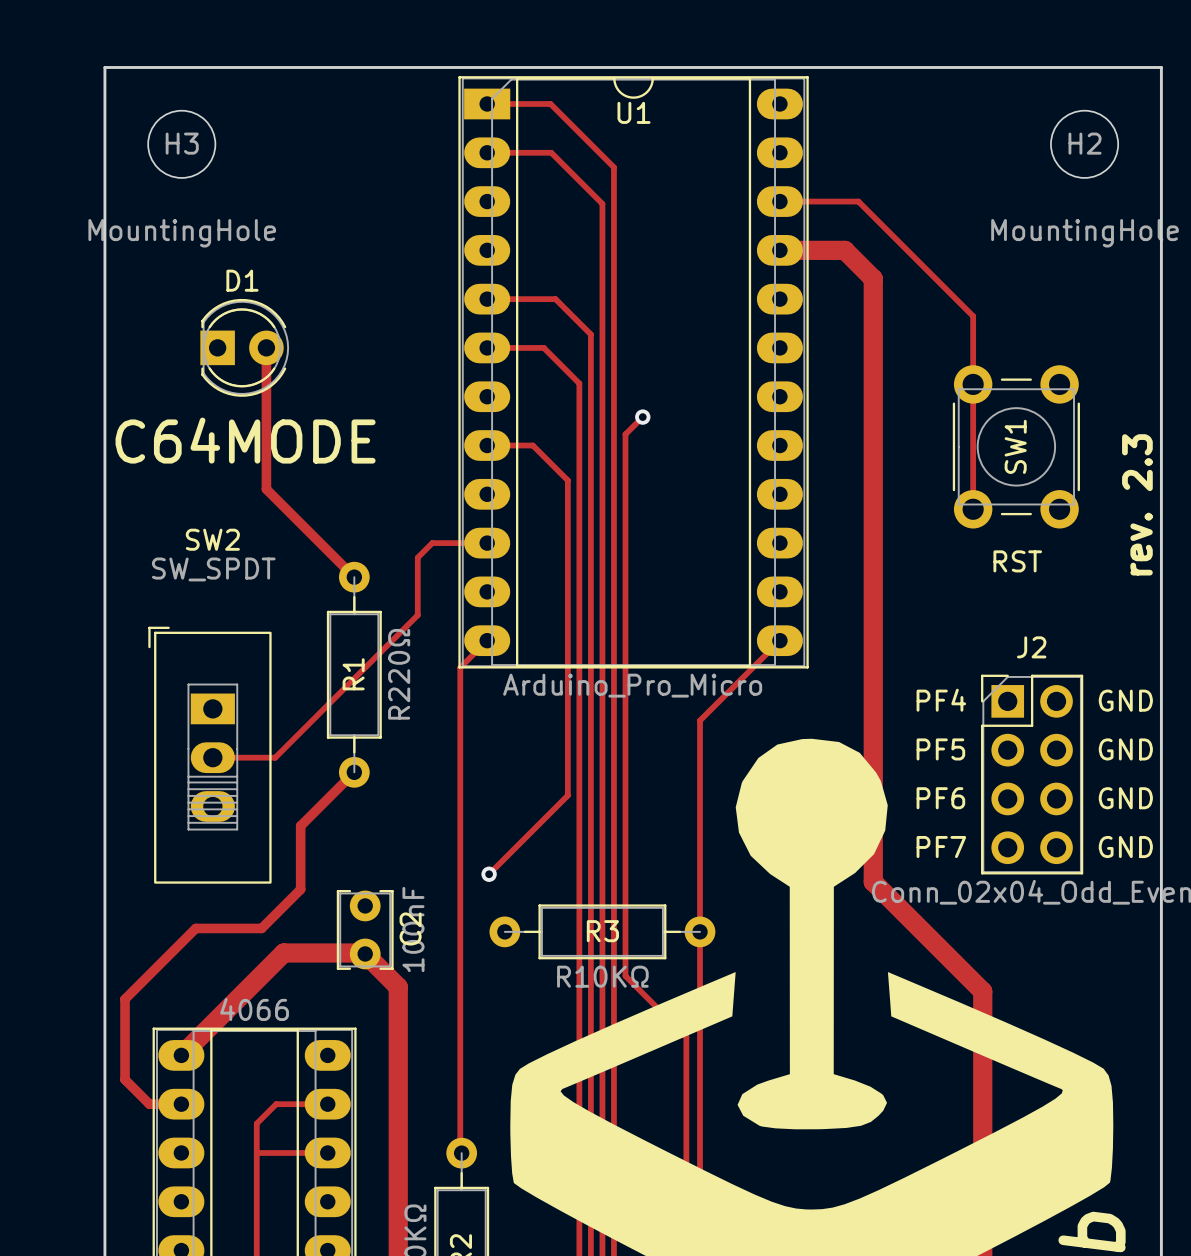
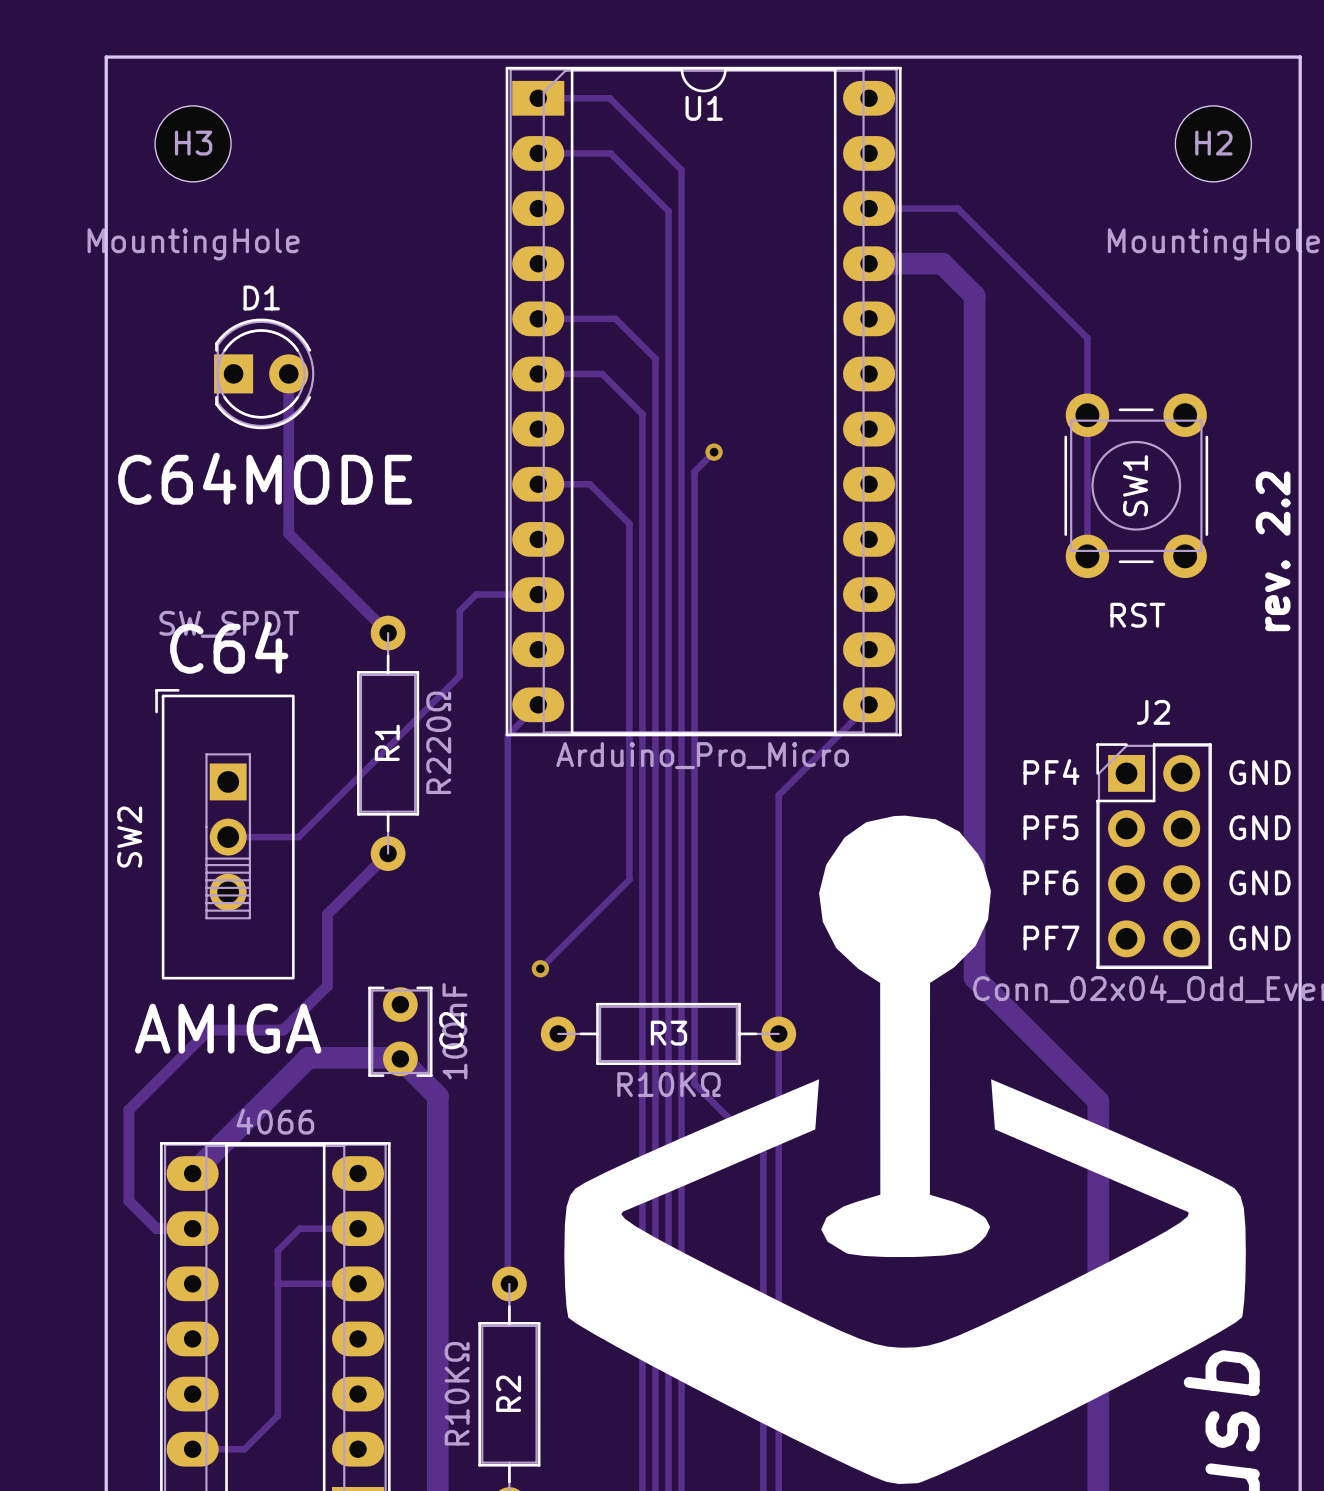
text: rev. 2.3 (1137, 504) -> rev. 2.2 (1273, 551)
SW2 name position: SW2 (212, 539) -> SW2 (129, 837)
SW2 footprint: [148, 626, 272, 884] -> [155, 689, 295, 980]

